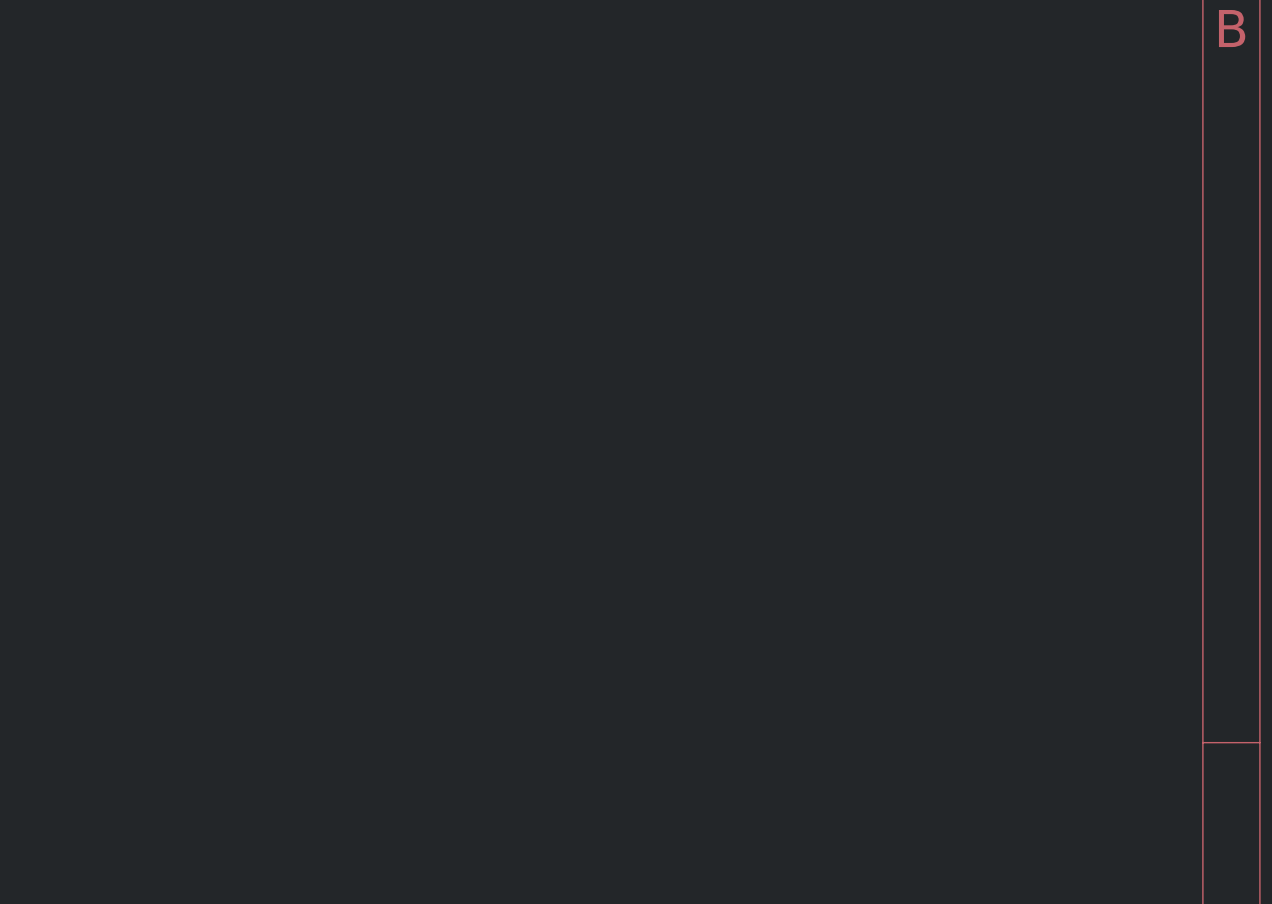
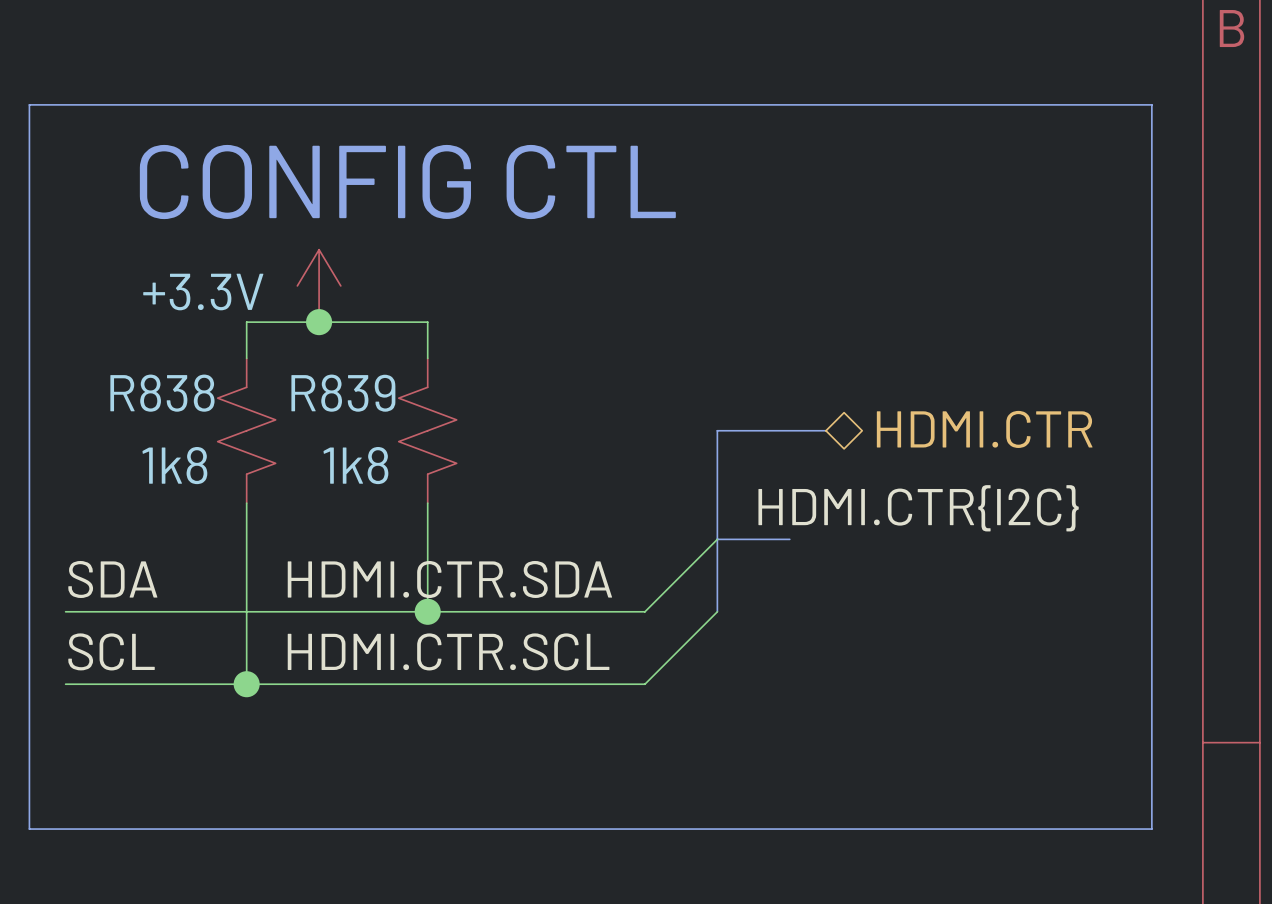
line: none -> (29, 104) (1151, 104) (1151, 829) (29, 829) (29, 104)
text: none -> CONFIG CTL (407, 182)
power symbol: none -> +3.3V (319, 285)
junction: none -> (319, 322)
wire: none -> (246, 358) (246, 322) (427, 322) (427, 358)
hierarchical label: none -> HDMI.CTR (984, 429)
R838: none -> 1k8 (246, 430)
R839: none -> 1k8 (427, 430)
bus: none -> (825, 430) (717, 430) (717, 611)
wire: none -> (246, 503) (246, 684)
wire: none -> (427, 503) (427, 611)
label: none -> HDMI.CTR{I2C} (918, 508)
wire: none -> (717, 539) (644, 611) (65, 611)
bus: none -> (717, 539) (789, 539)
label: none -> SDA (112, 579)
label: none -> HDMI.CTR.SDA (449, 579)
junction: none -> (427, 611)
wire: none -> (717, 611) (644, 684) (65, 684)
label: none -> SCL (111, 651)
label: none -> HDMI.CTR.SCL (448, 651)
junction: none -> (246, 684)

